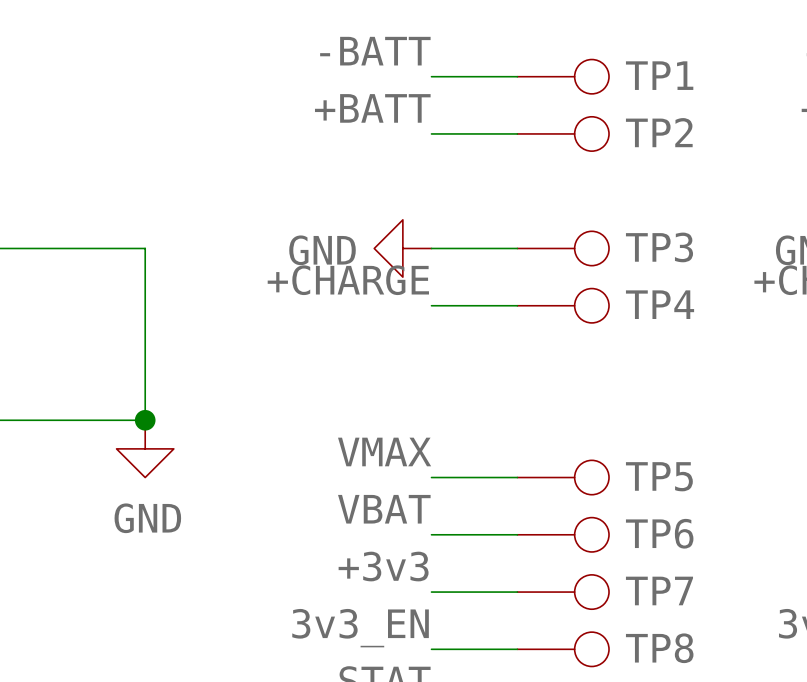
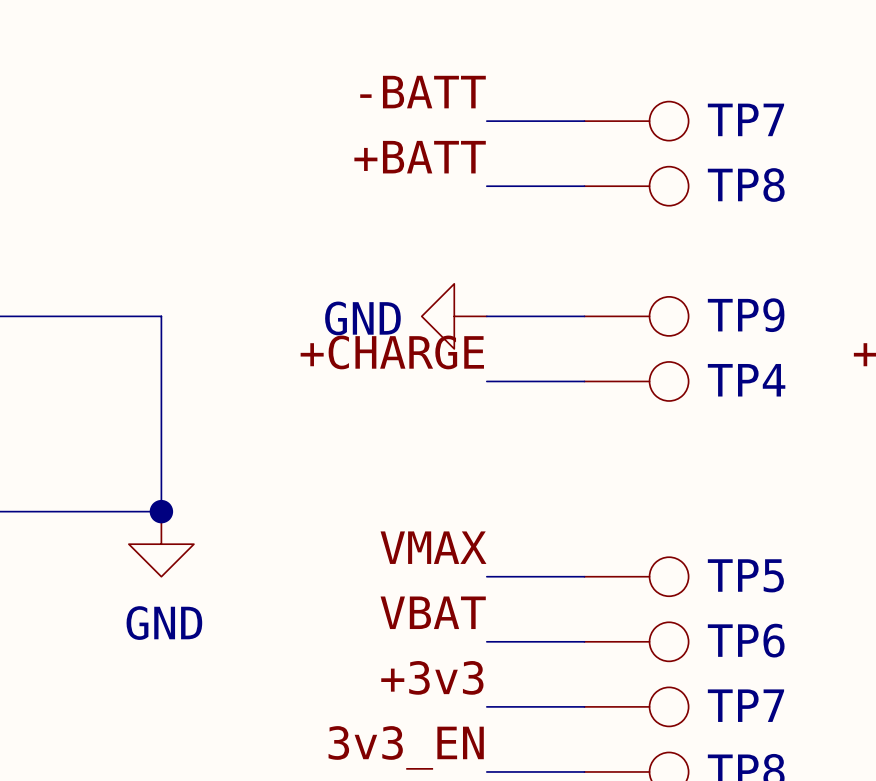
TP1 name: TP1 (659, 75) -> TP7 (745, 119)
TP2 name: TP2 (659, 132) -> TP8 (746, 185)
TP3 name: TP3 (659, 247) -> TP9 (746, 315)

